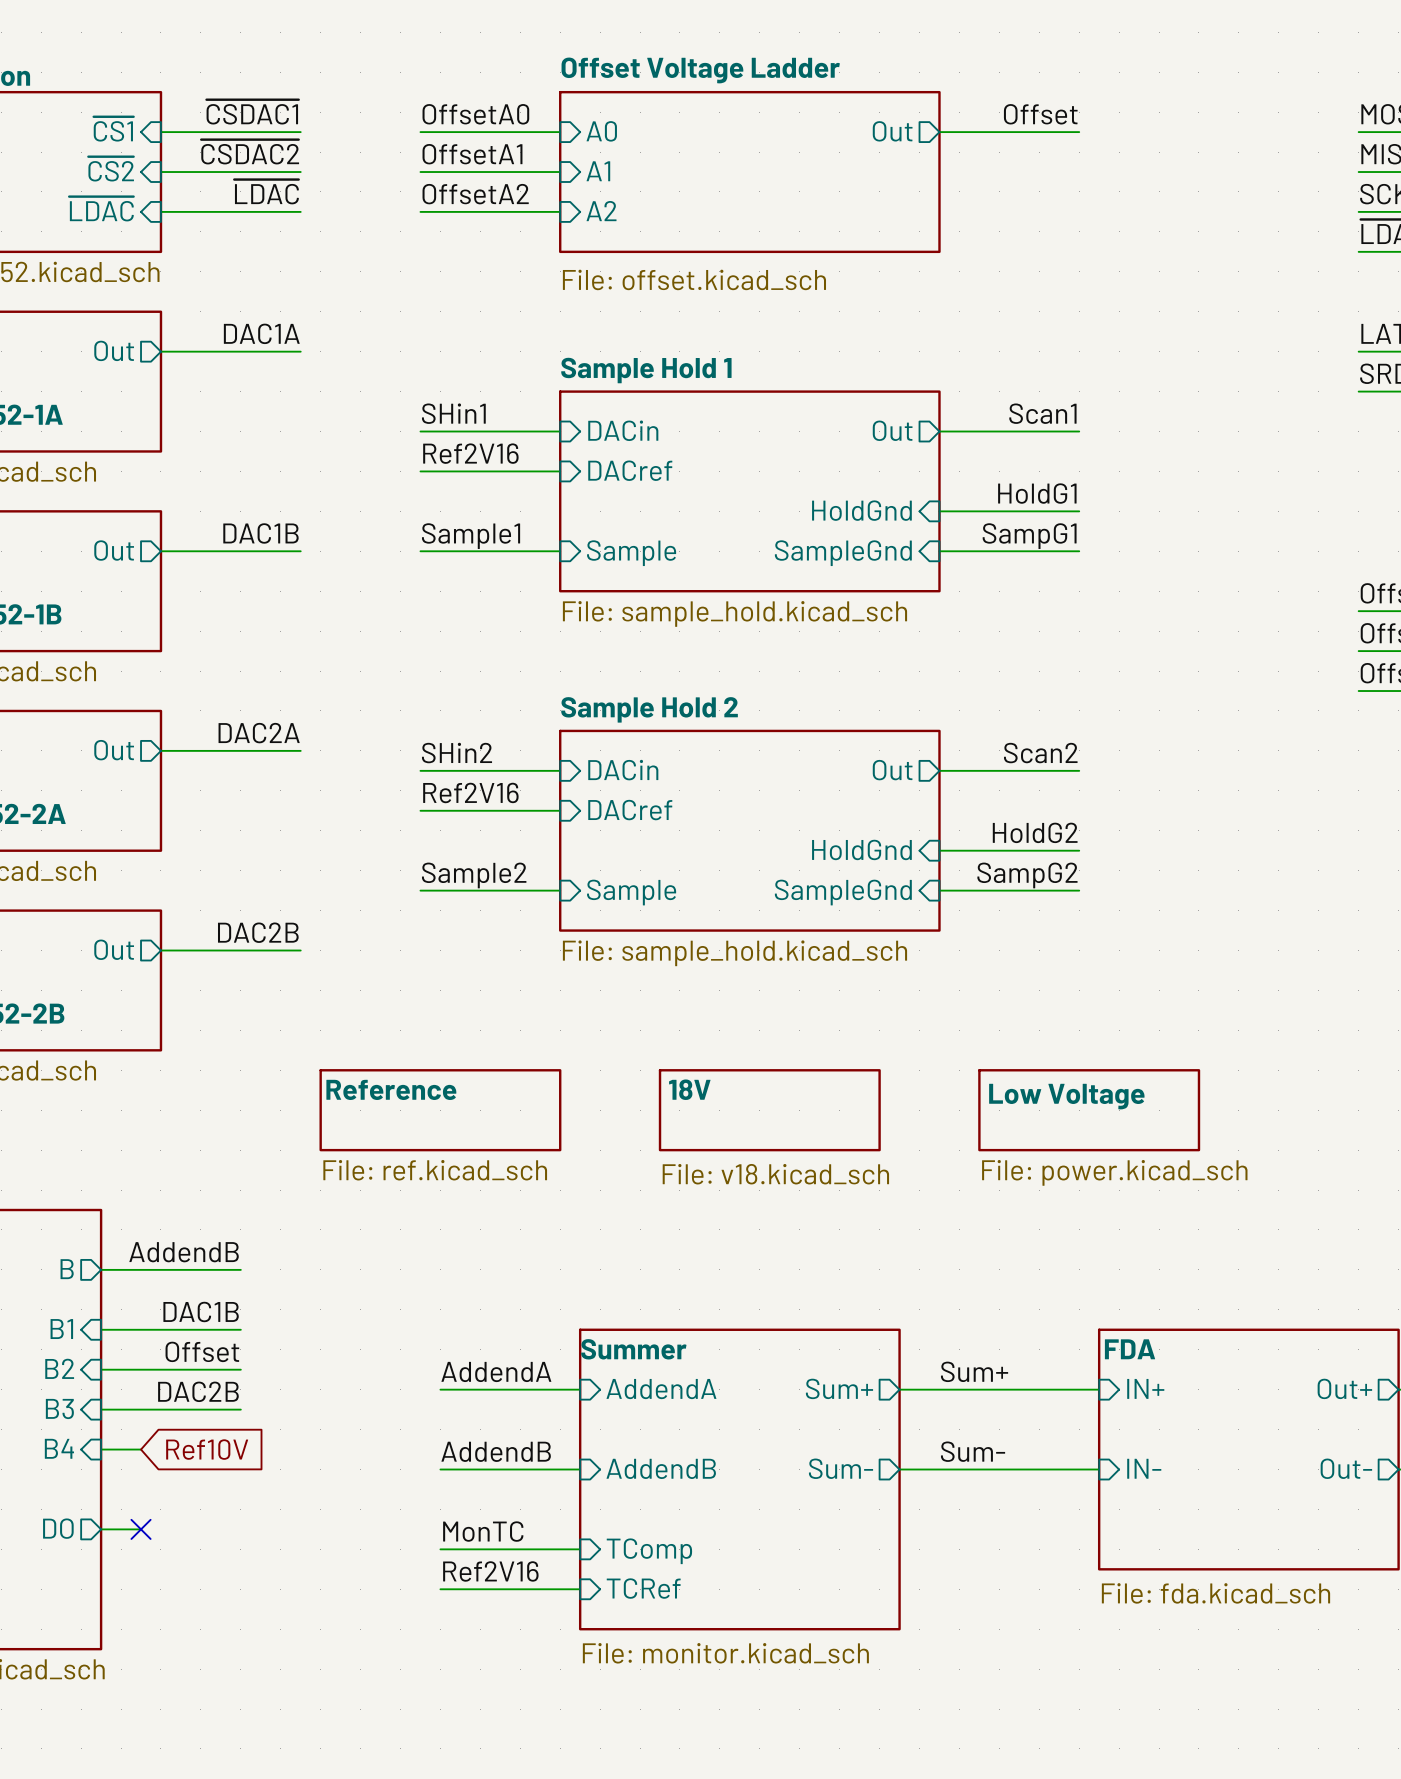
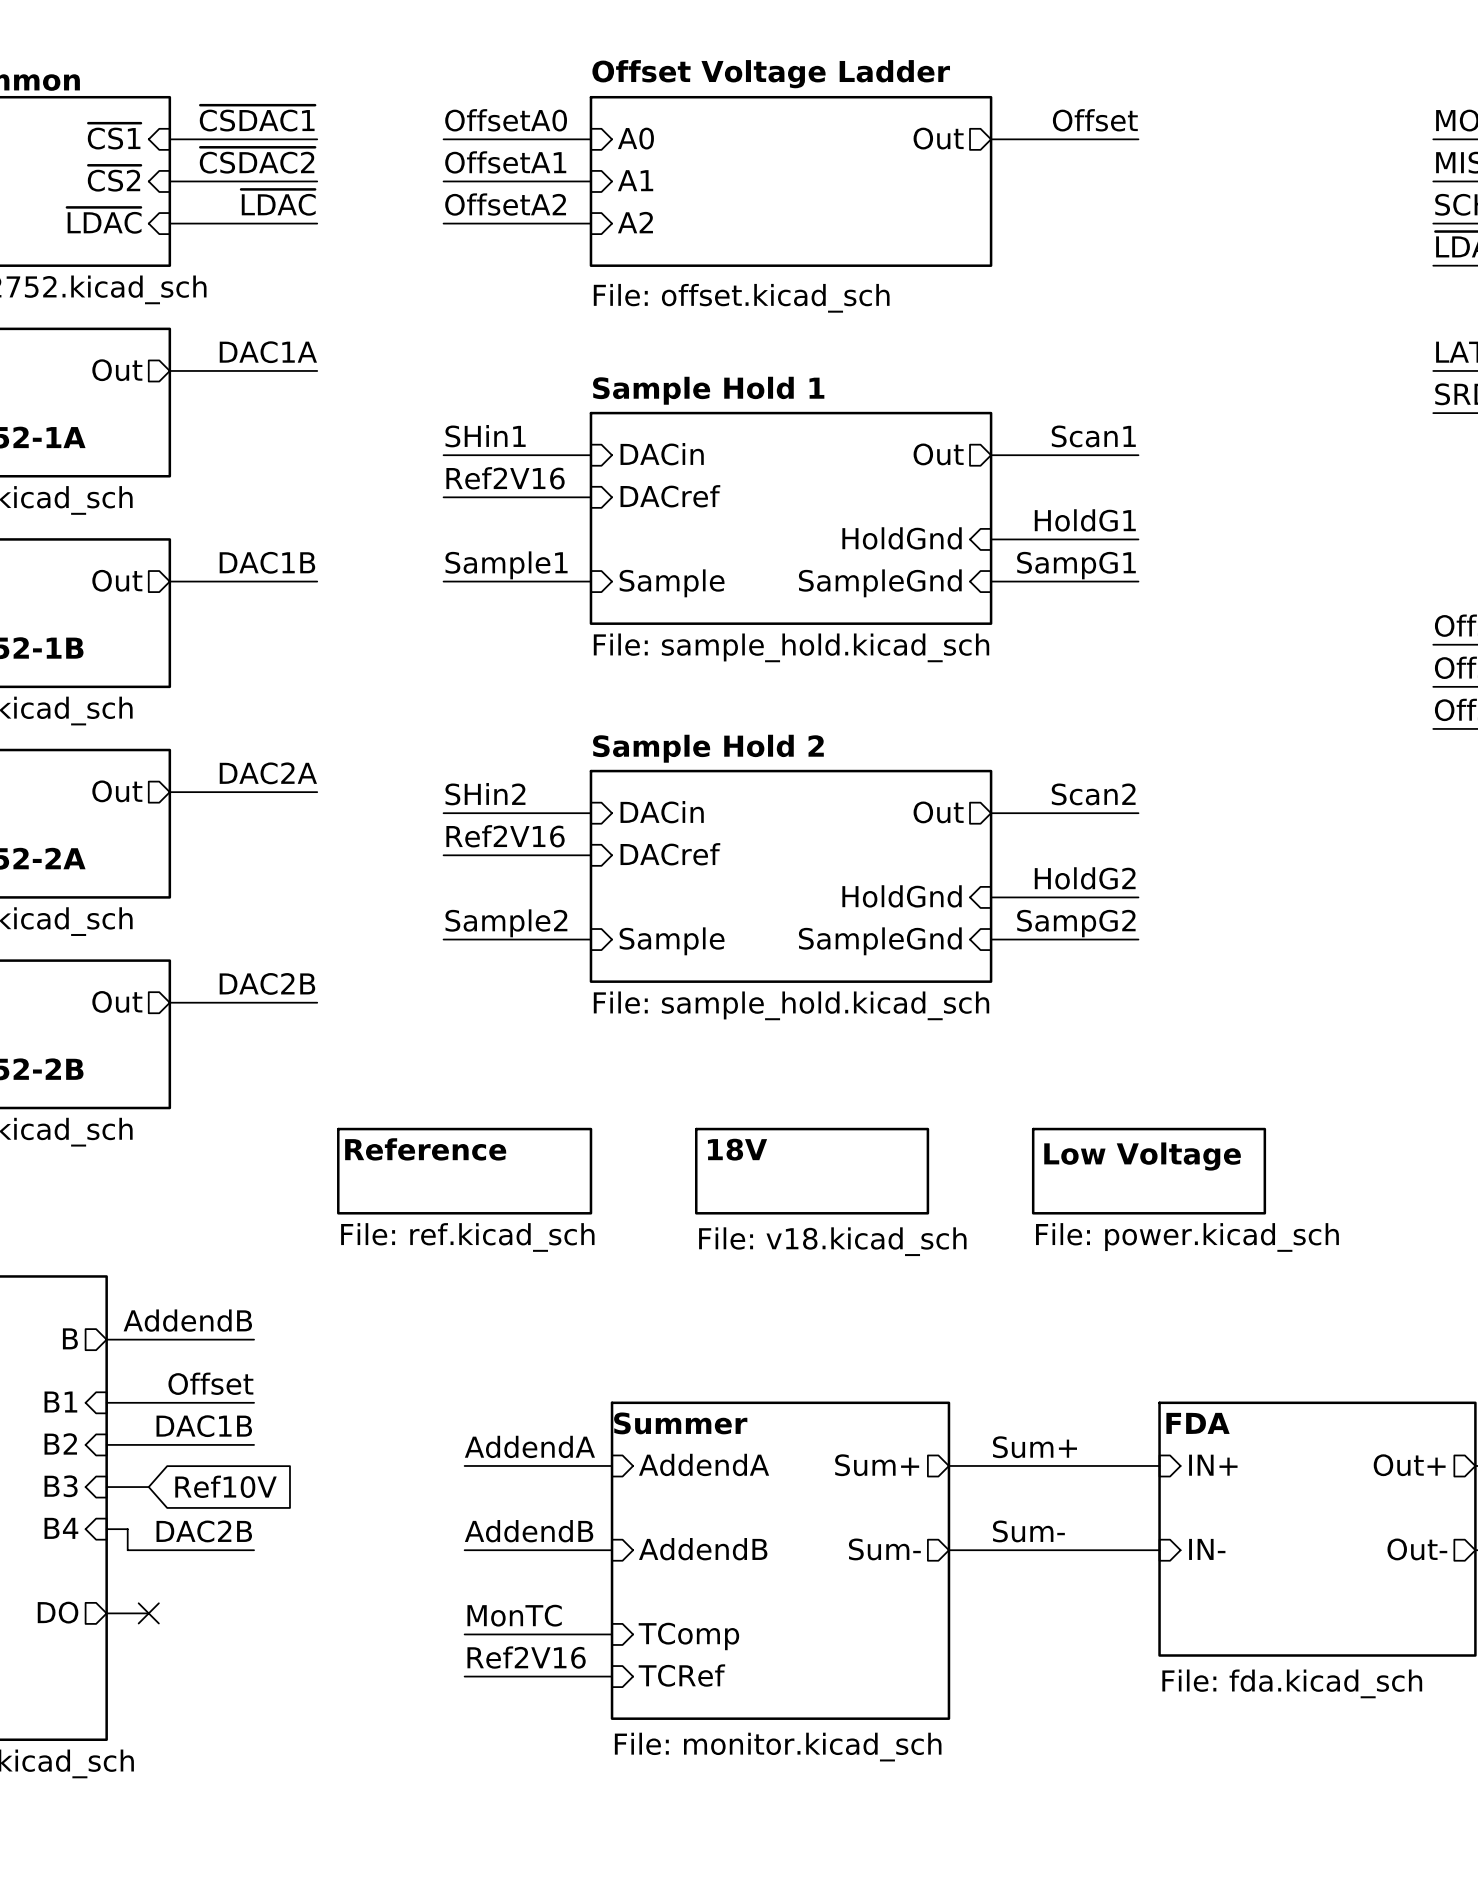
label: DAC1B (201, 1311) -> Offset (210, 1383)
label: Offset (202, 1351) -> DAC1B (204, 1426)
label position: DAC2B (198, 1391) -> DAC2B (204, 1531)
wire: (141, 1409) (240, 1409) -> none
wire: (121, 1449) (141, 1449) -> (127, 1529) (127, 1550) (254, 1550)
global label position: Ref10V (207, 1449) -> Ref10V (226, 1486)

